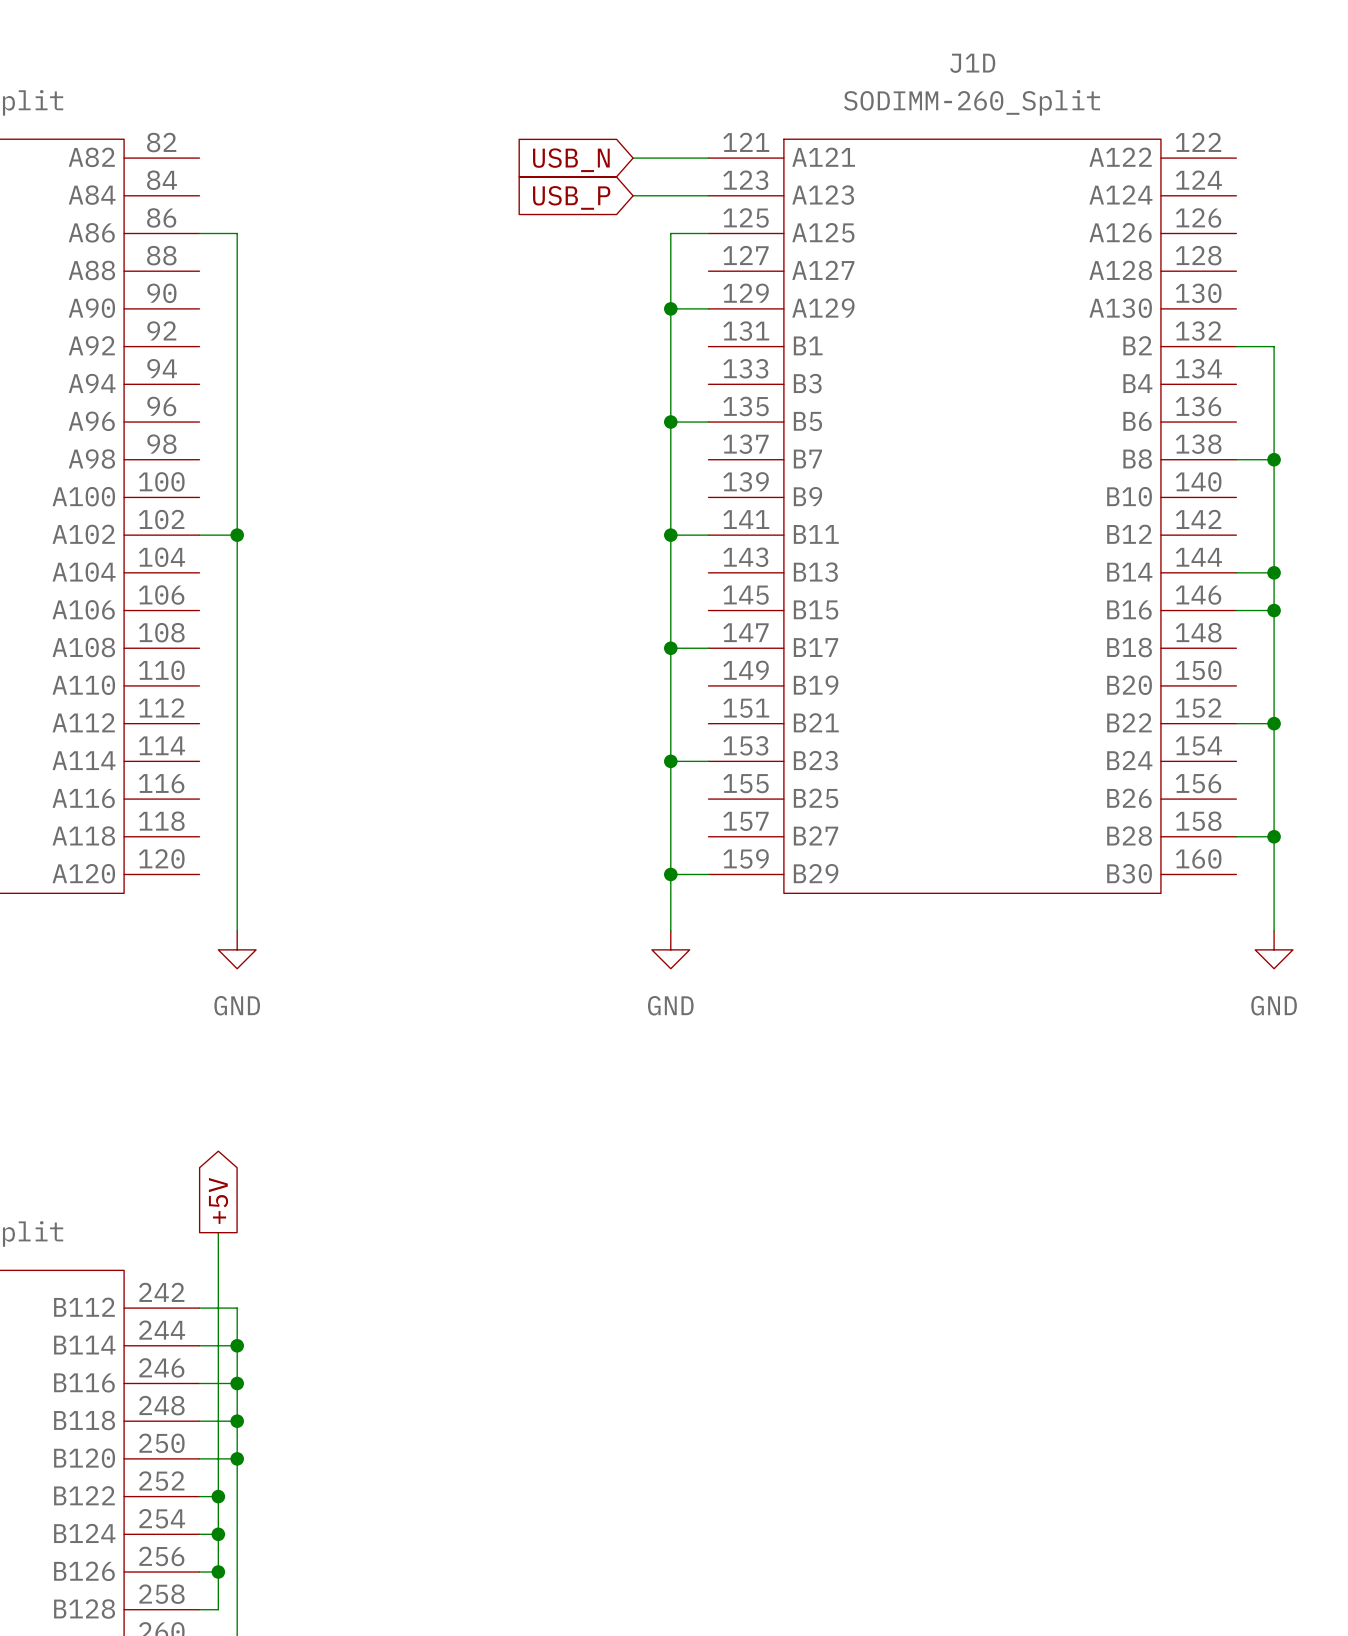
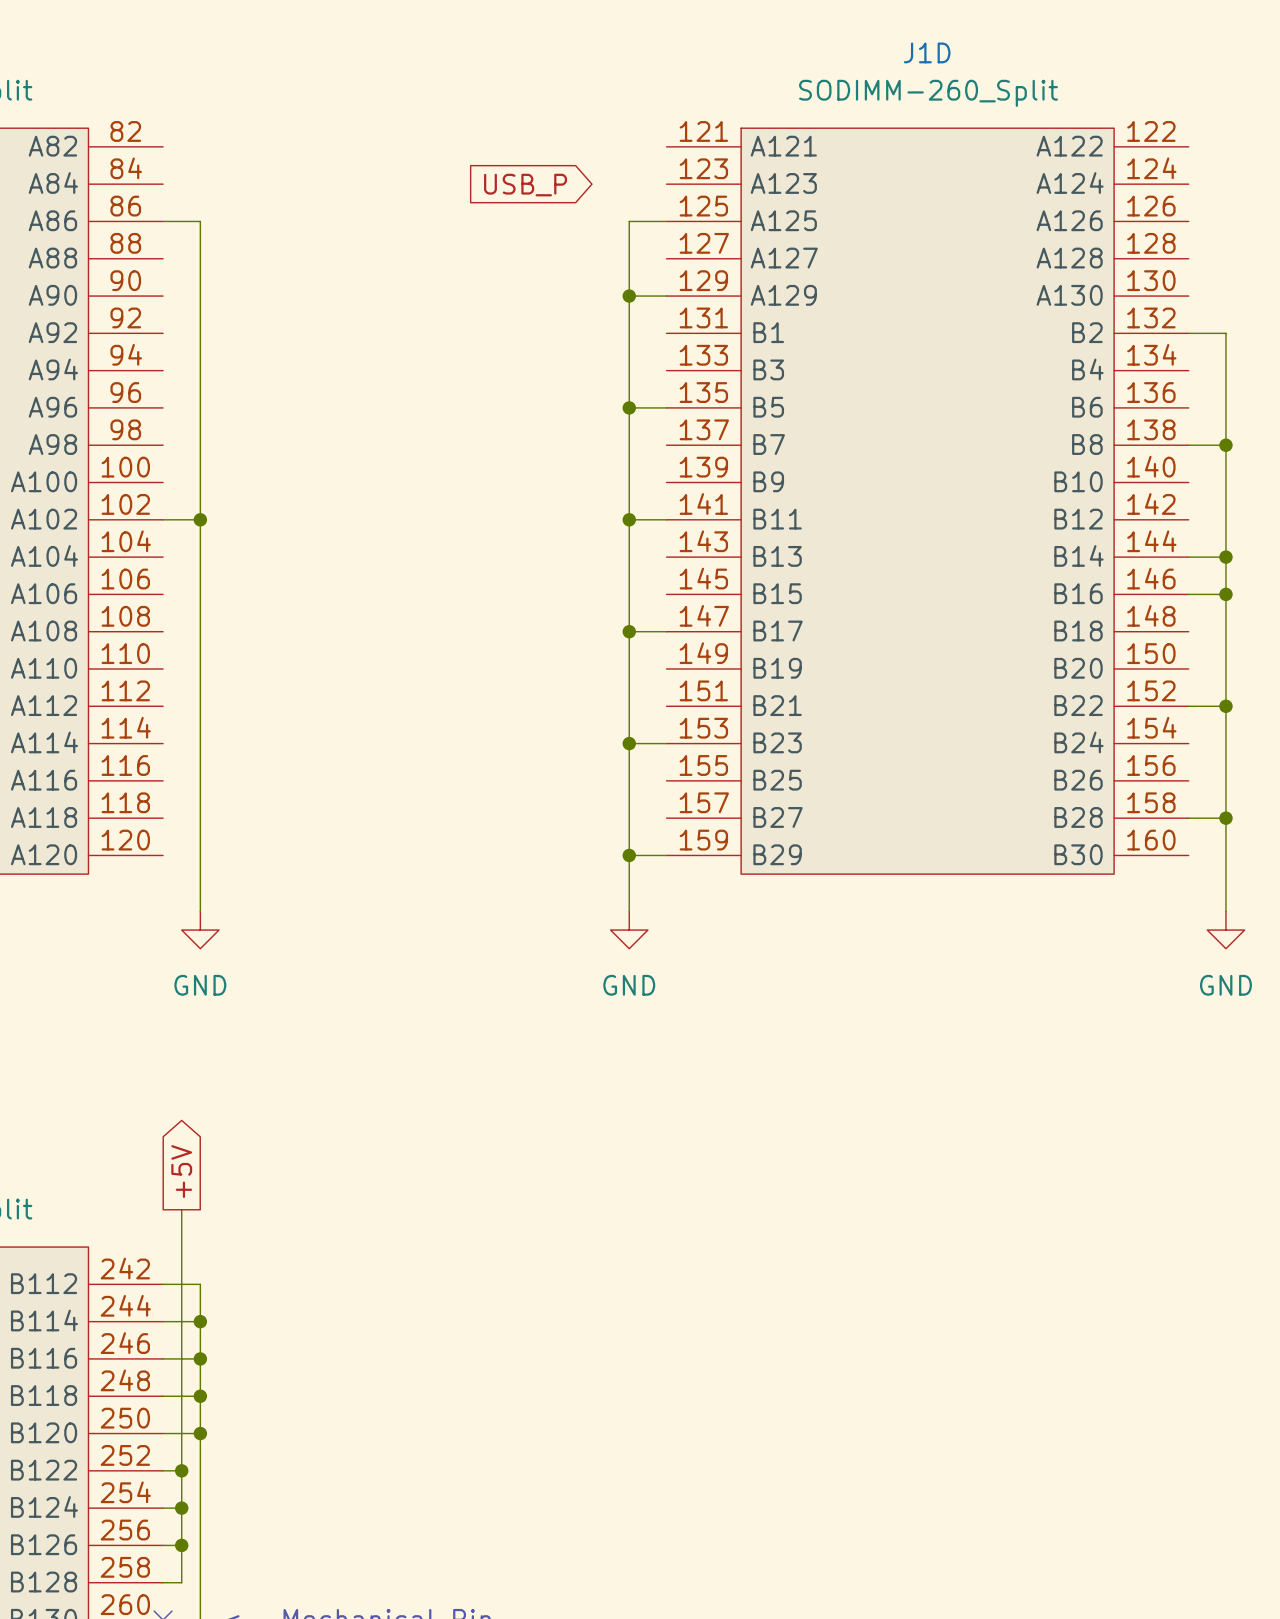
wire: (633, 158) (708, 158) -> none
global label: USB_N (571, 160) -> none
wire: (633, 195) (708, 195) -> none

